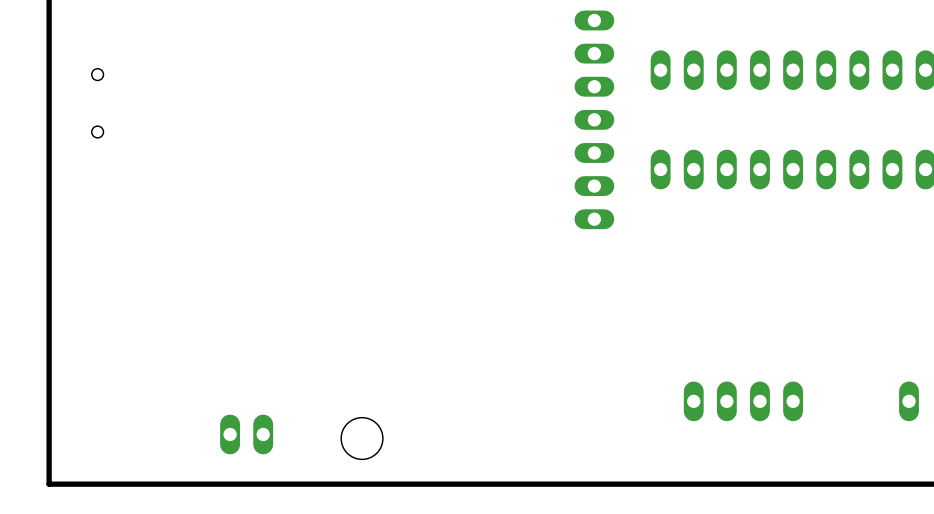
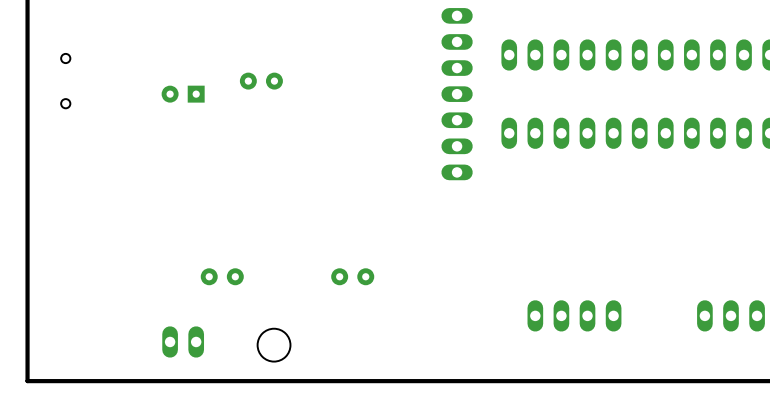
part: none -> (261, 81)
part: none -> (183, 94)
part: none -> (222, 276)
part: none -> (352, 276)

